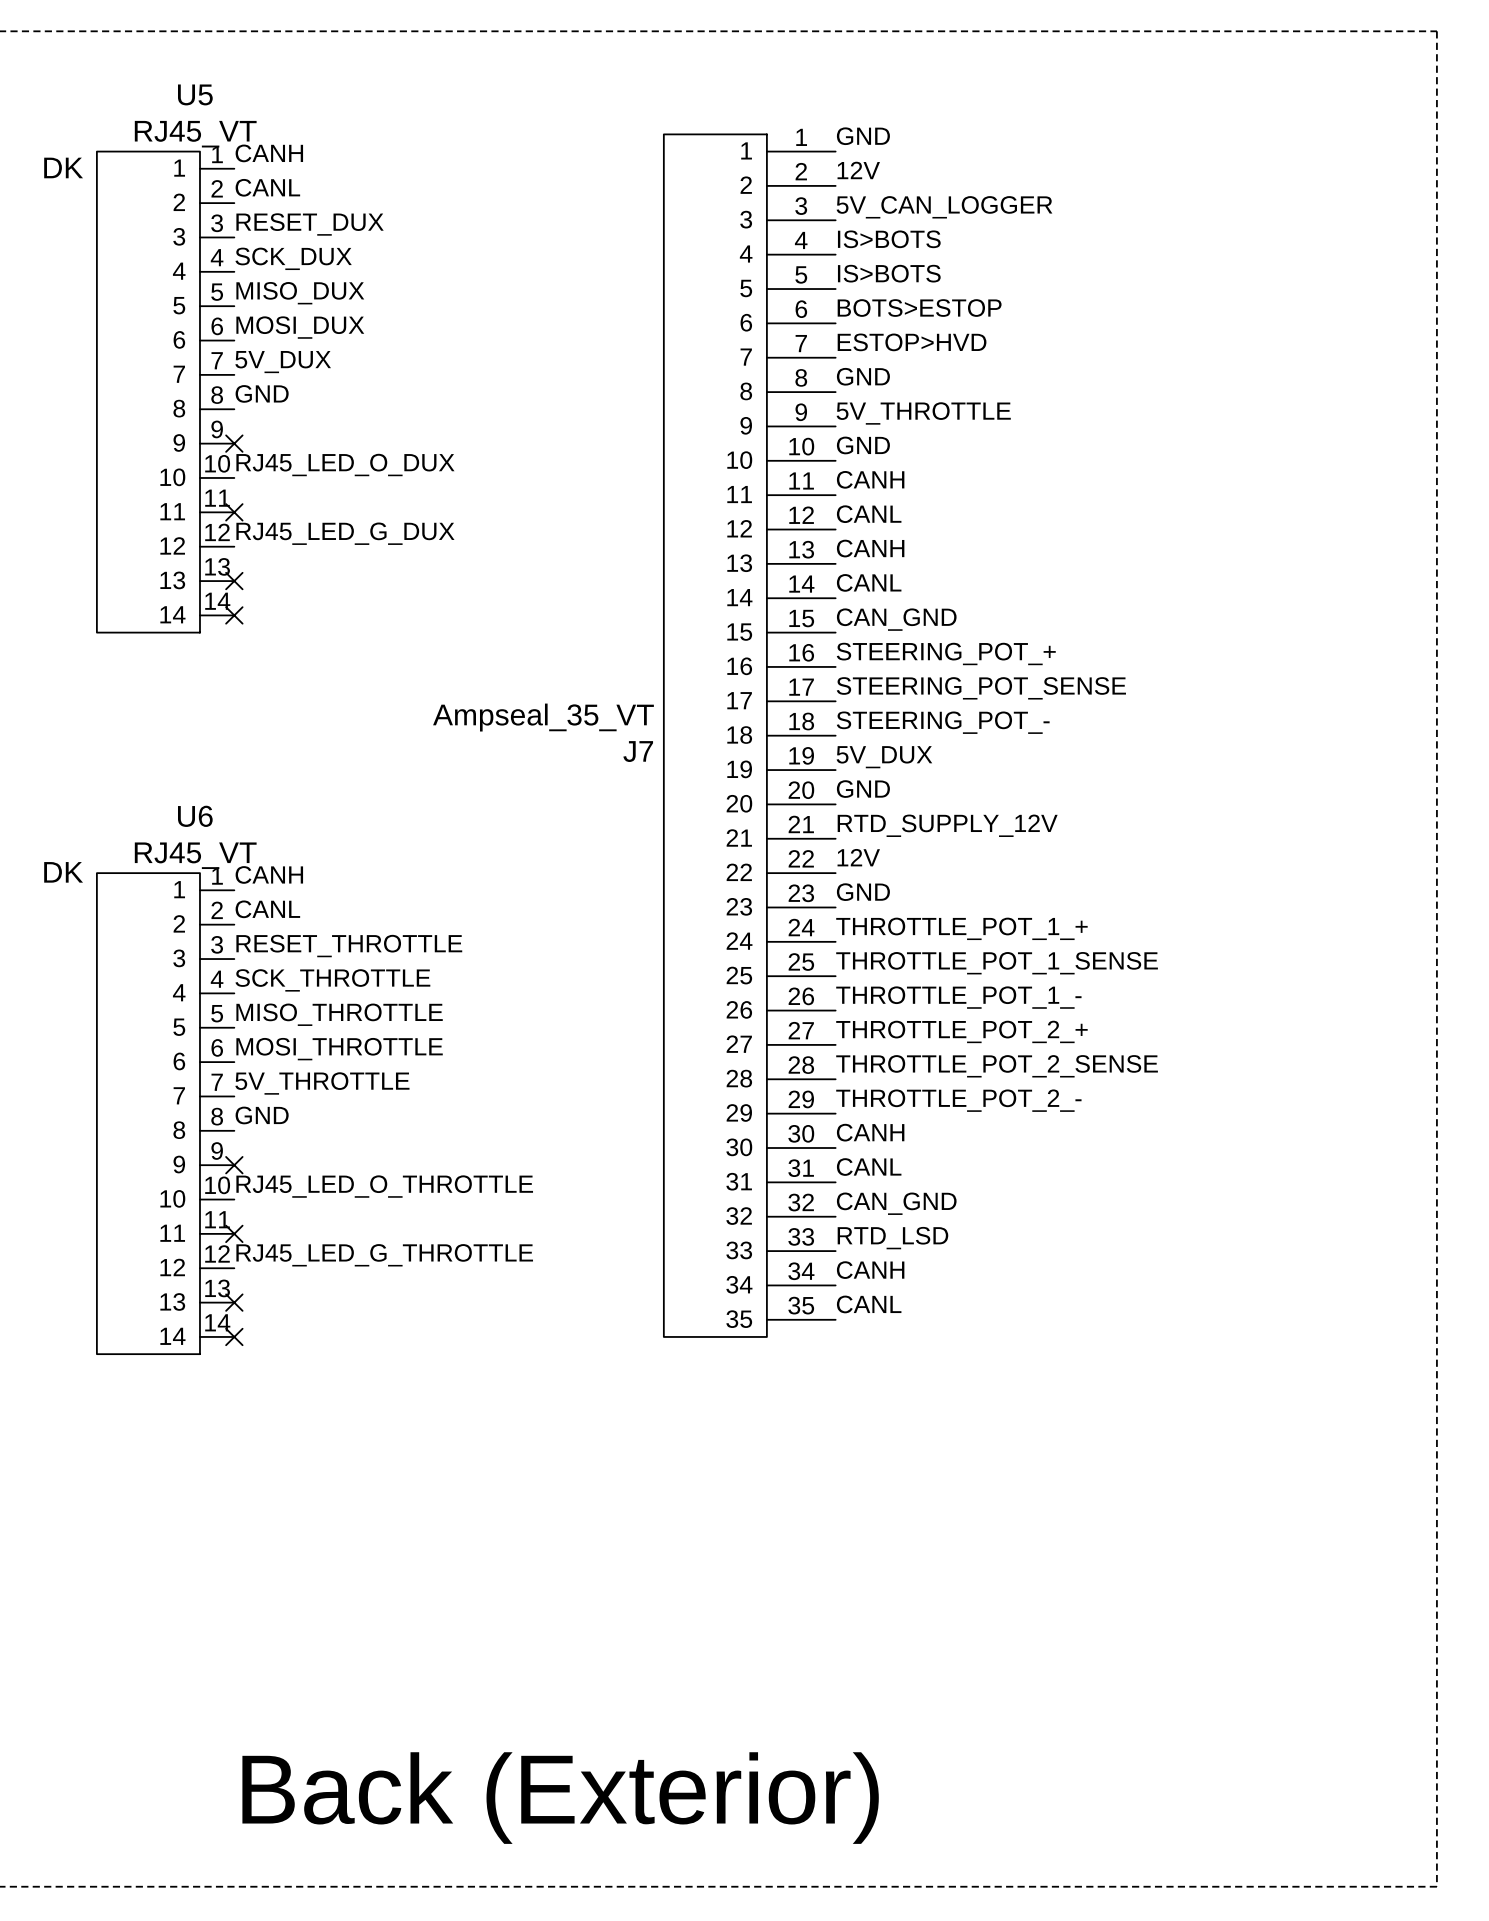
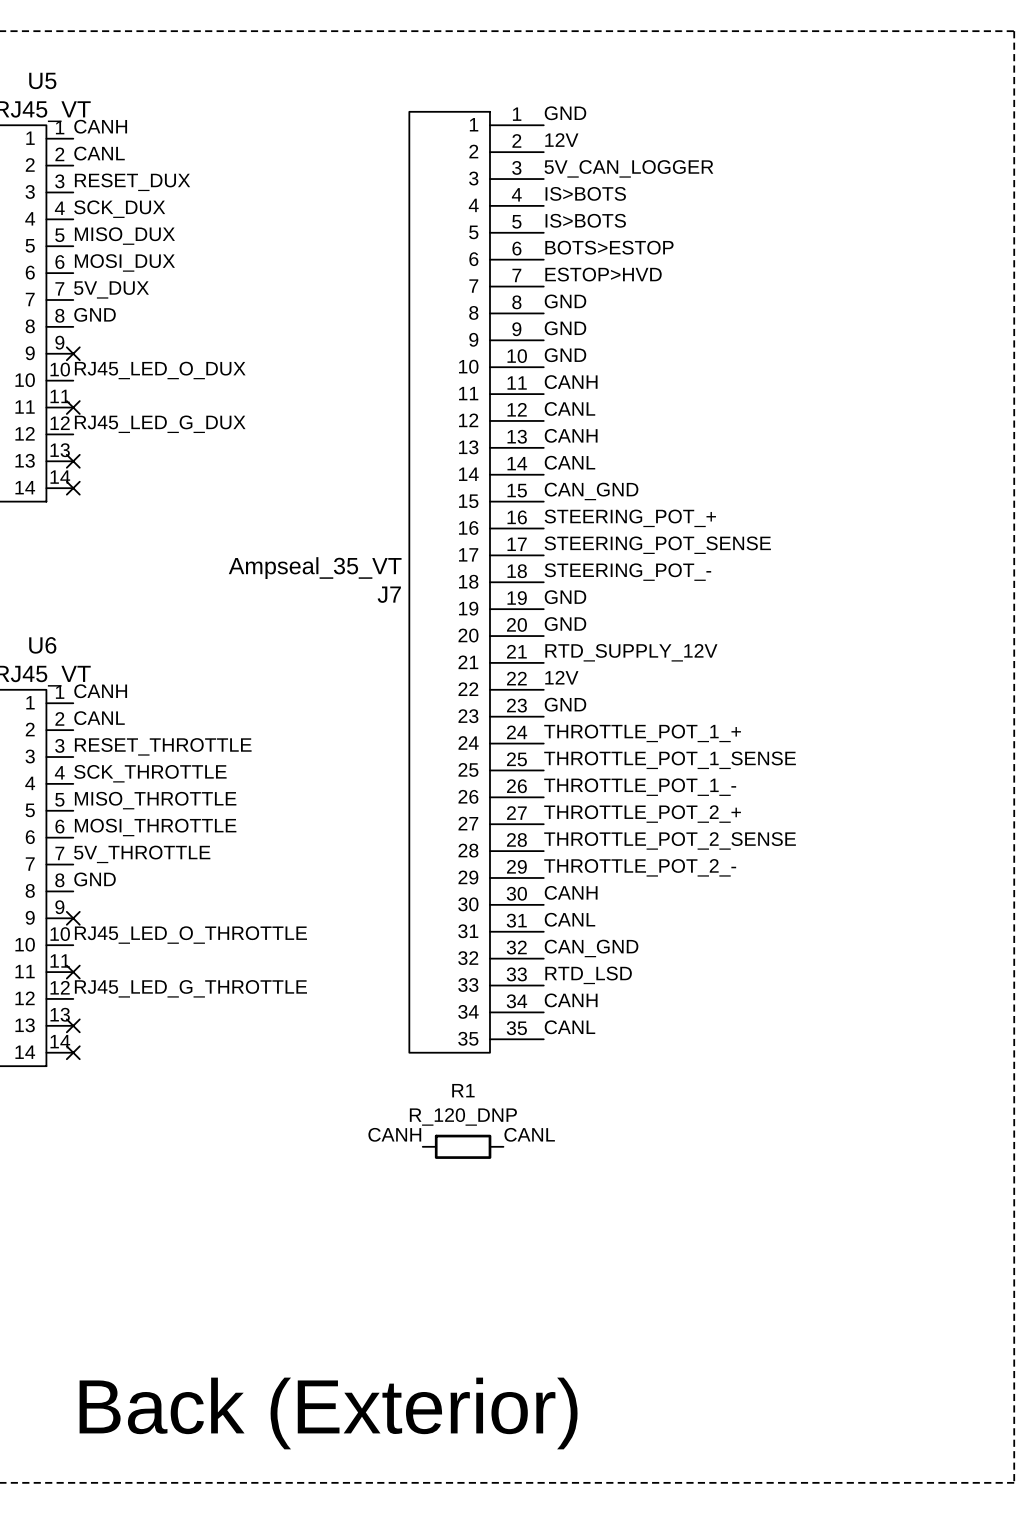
label: 5V_THROTTLE (923, 413) -> GND (565, 328)
label: 5V_DUX (884, 757) -> GND (565, 597)
label: none -> CANH (394, 1134)
label: none -> CANL (529, 1134)
R1: none -> R_120_DNP (463, 1146)

